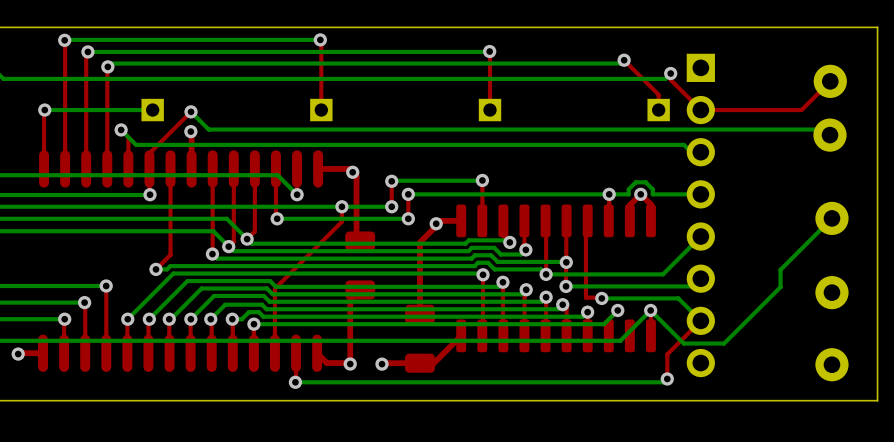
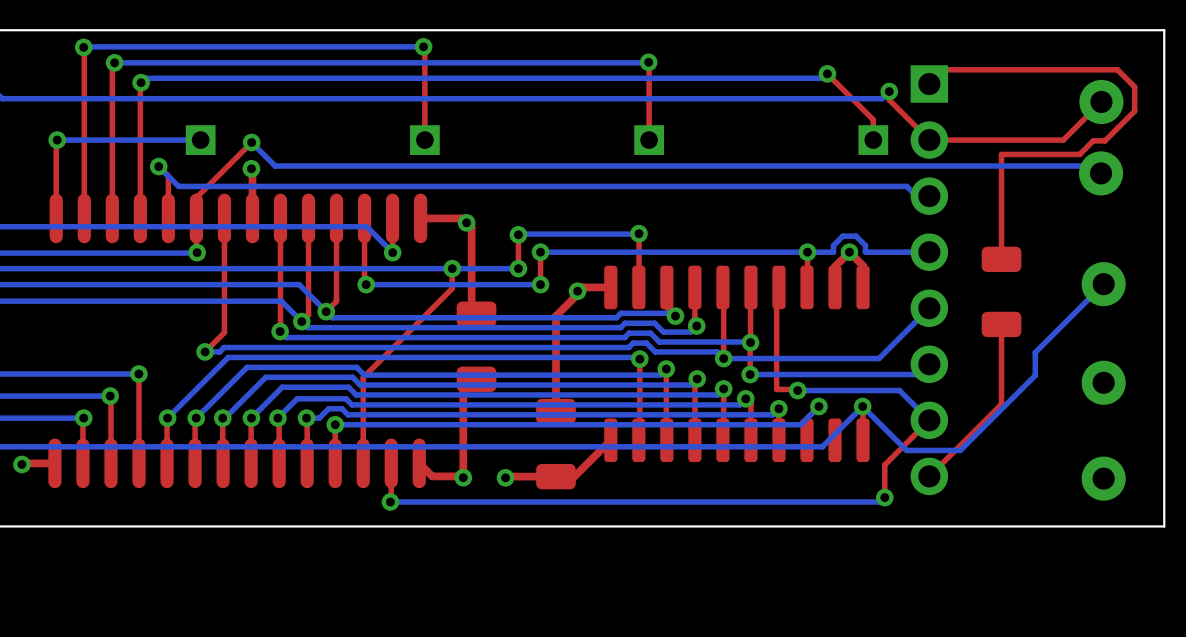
top track: none -> (929, 84) (943, 69) (1117, 69) (1134, 86) (1134, 111) (1104, 140) (1093, 140) (1079, 154) (1001, 154) (1001, 259)
part: none -> (1001, 291)
top track: none -> (1001, 324) (1001, 404) (929, 476)

